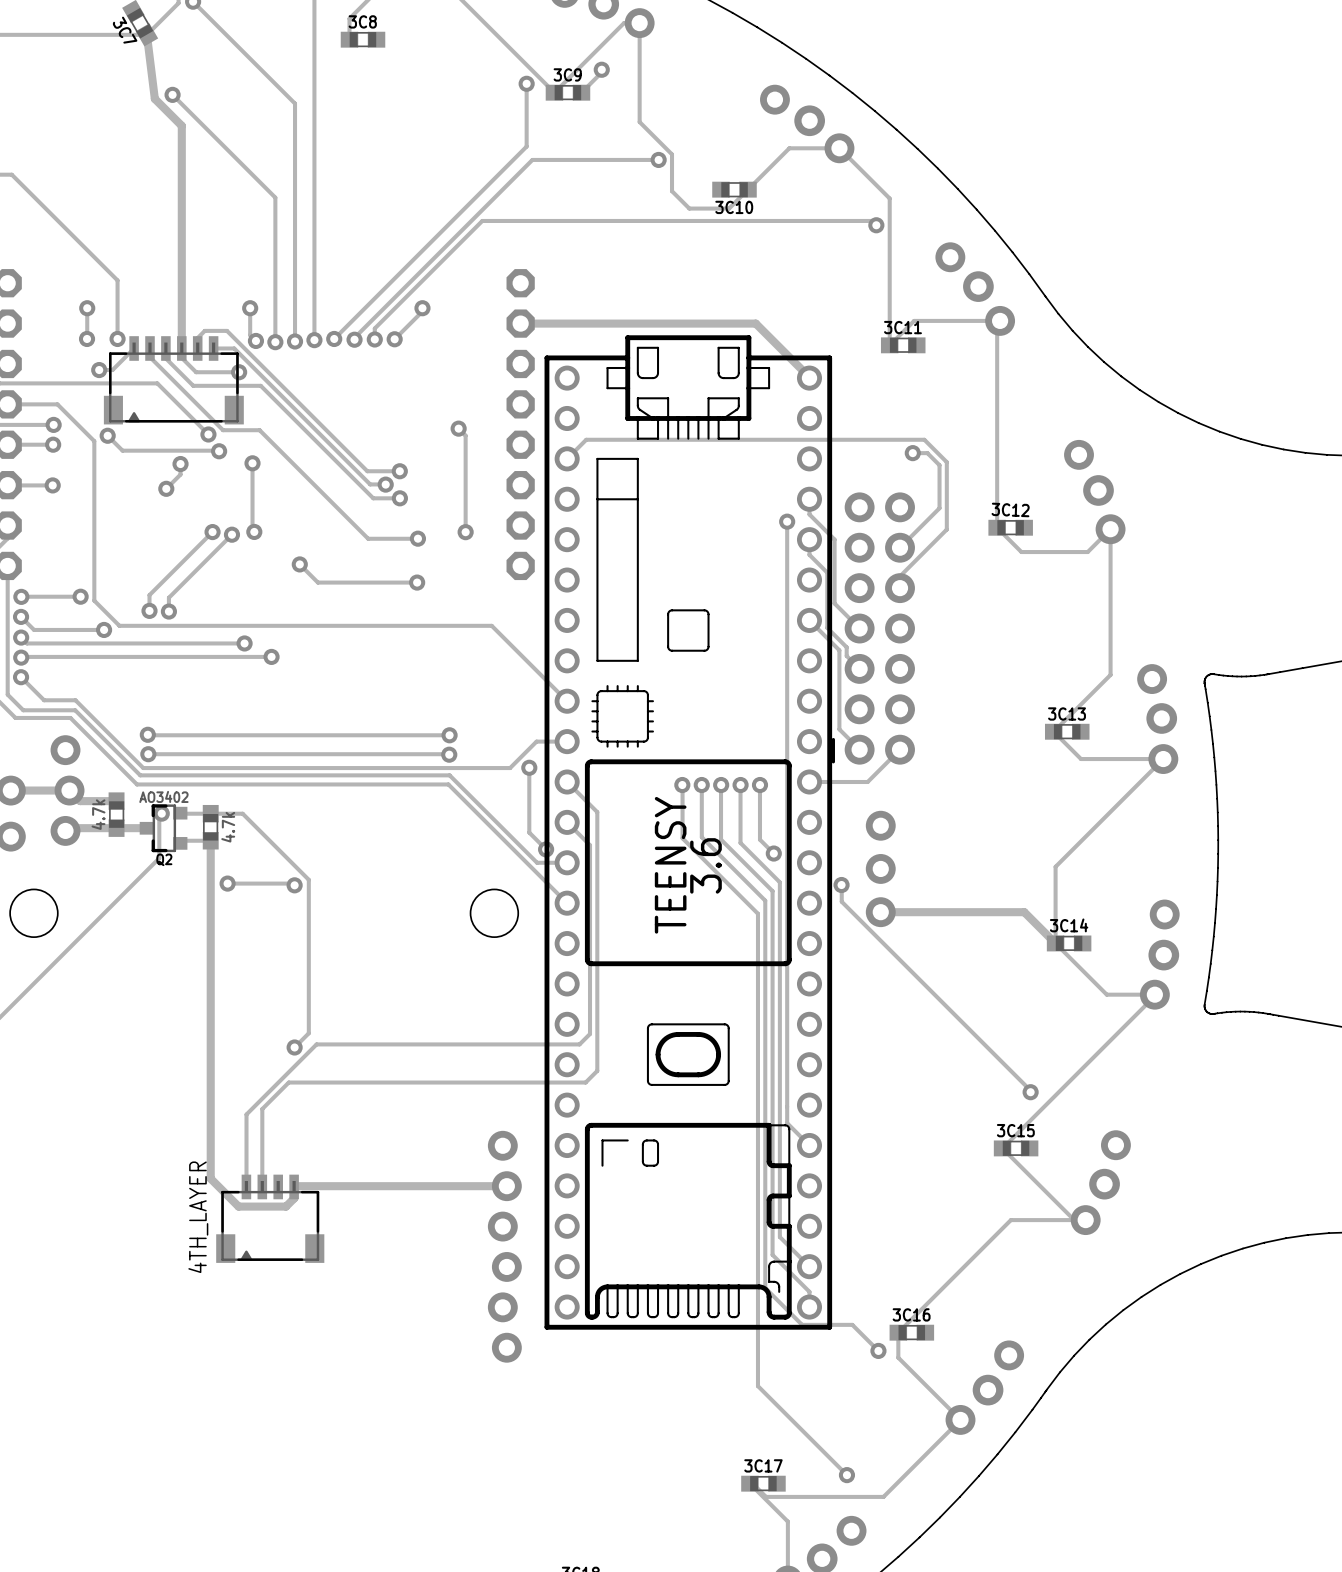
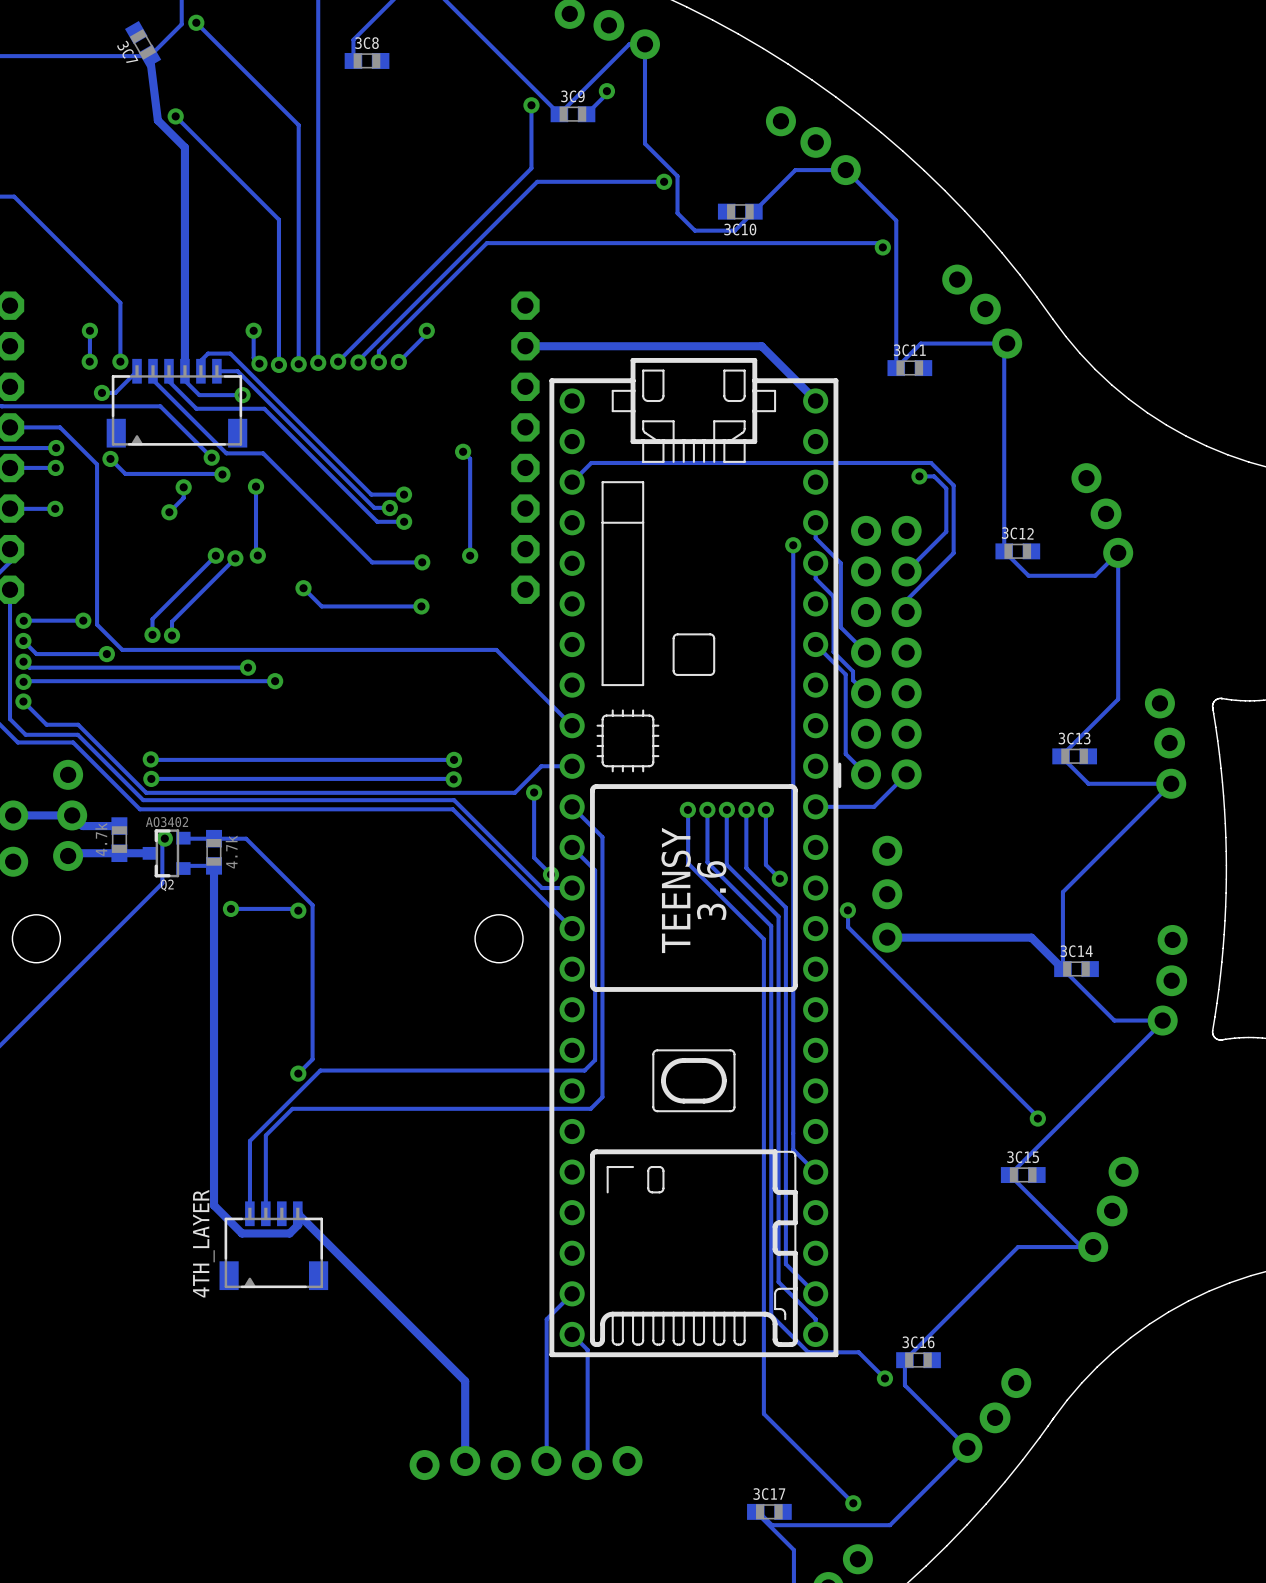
track: (506, 1186) (294, 1186) -> none
track: none -> (298, 1214) (465, 1381) (465, 1460)
part rotation: 0° (504, 1246) -> 90° clockwise (526, 1463)
part position: (504, 1246) -> (526, 1463)
track: none -> (572, 1293) (546, 1319) (546, 1460)
track: none -> (572, 1334) (587, 1349) (586, 1465)

